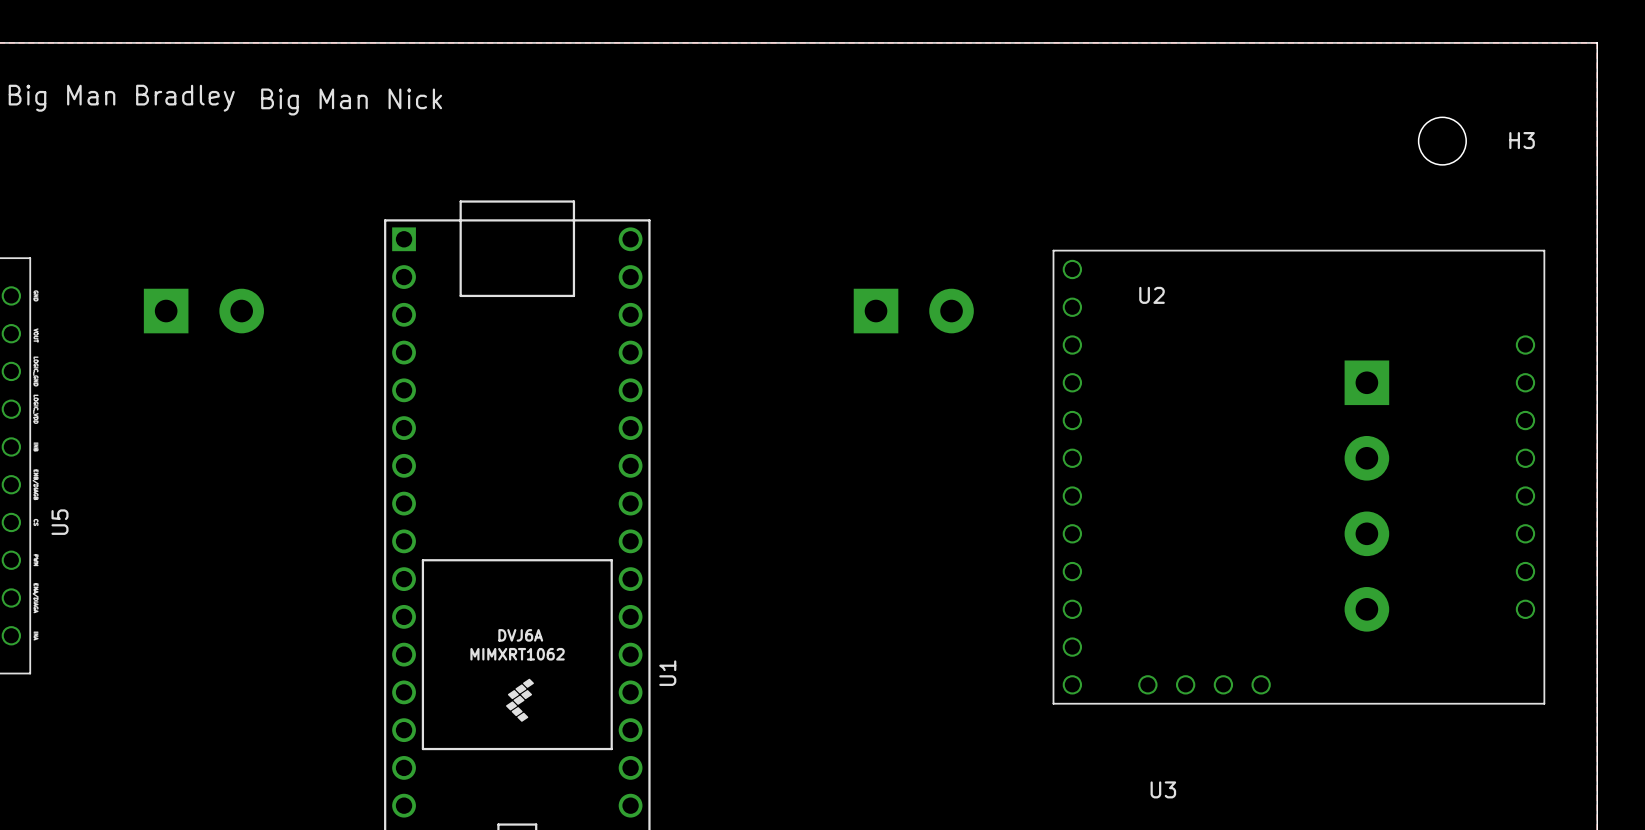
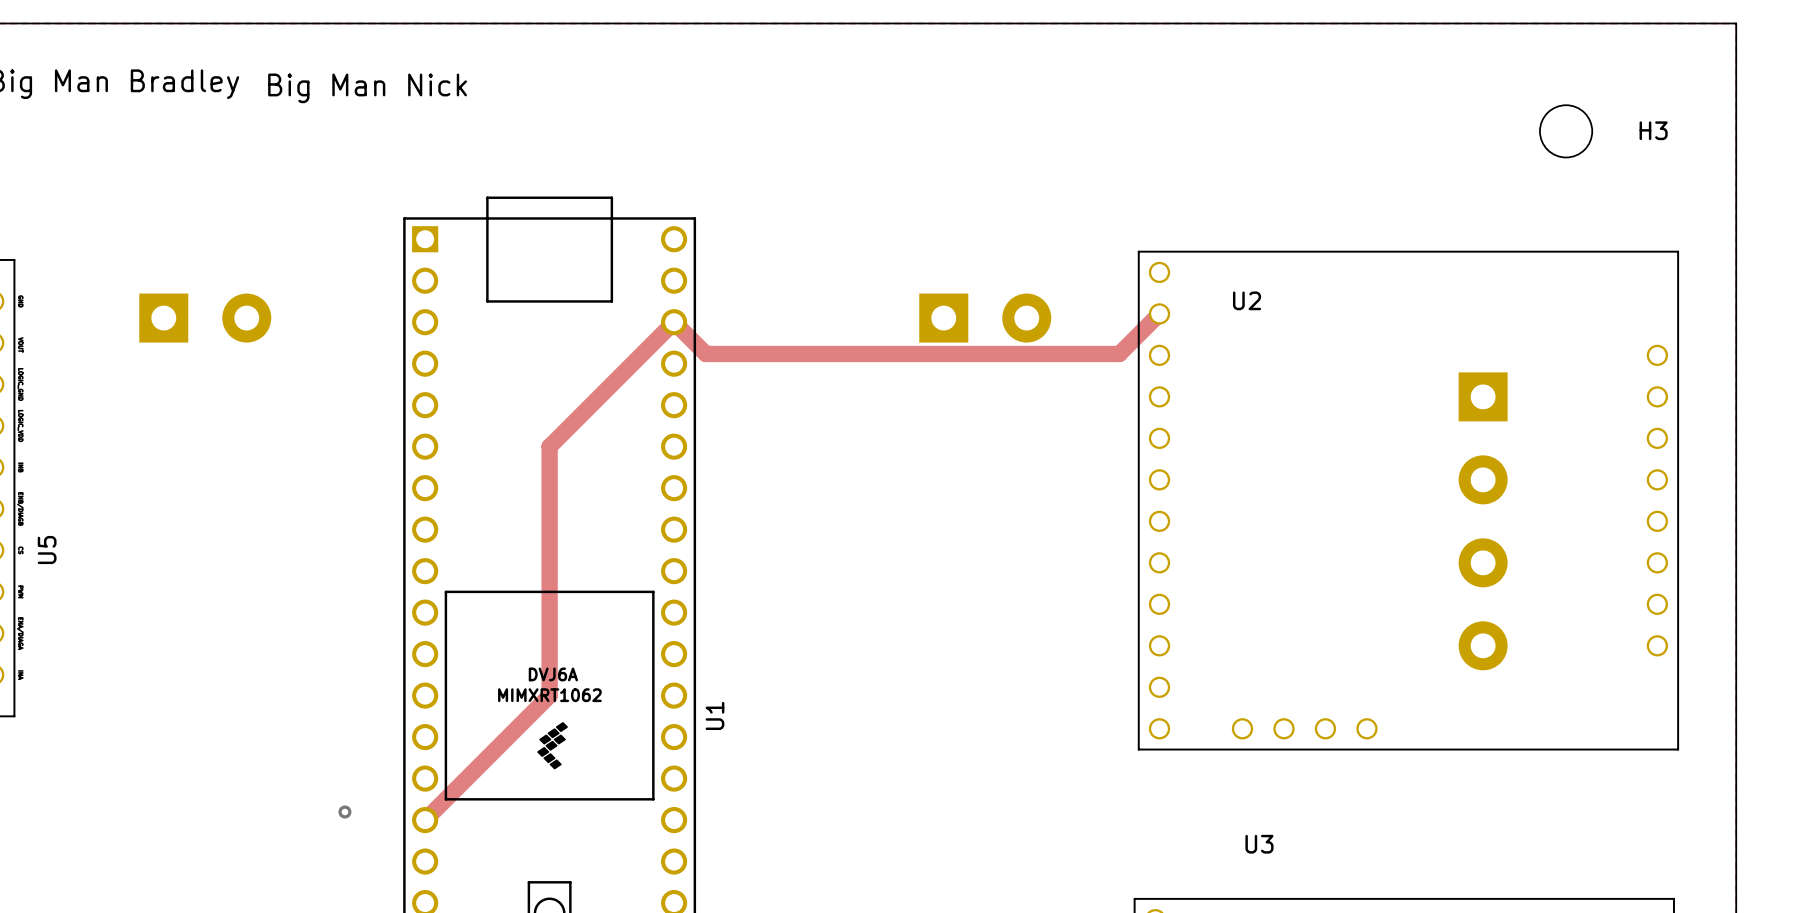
track: none -> (1159, 313) (1119, 353) (705, 353) (674, 322) (549, 446) (549, 695) (425, 820)
via: none -> (344, 812)

